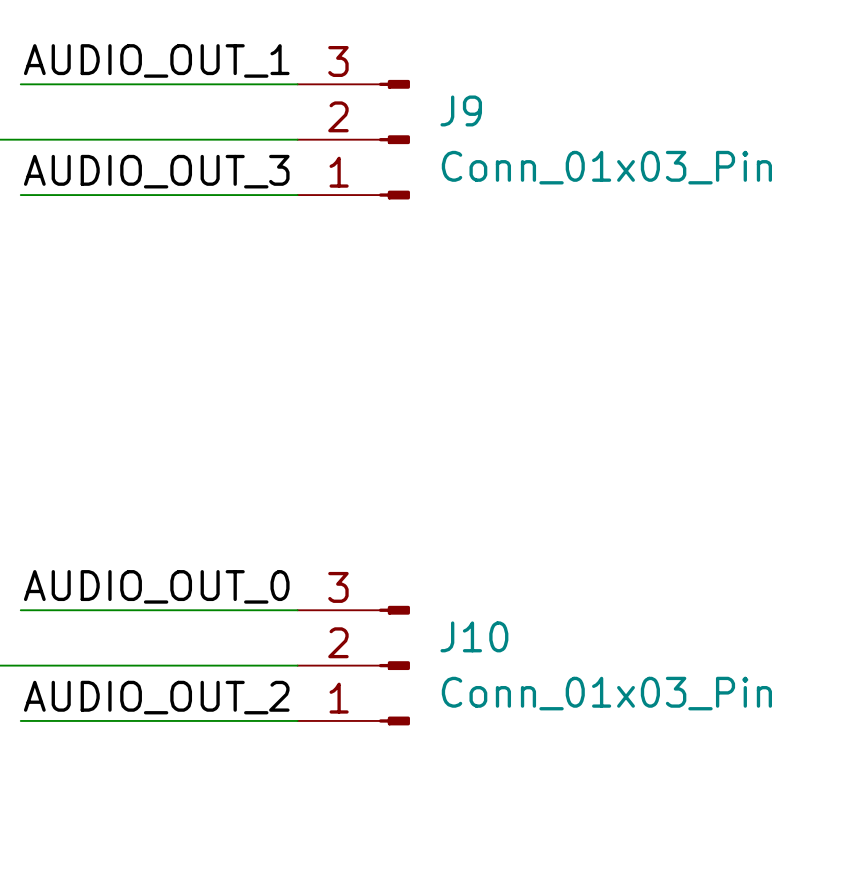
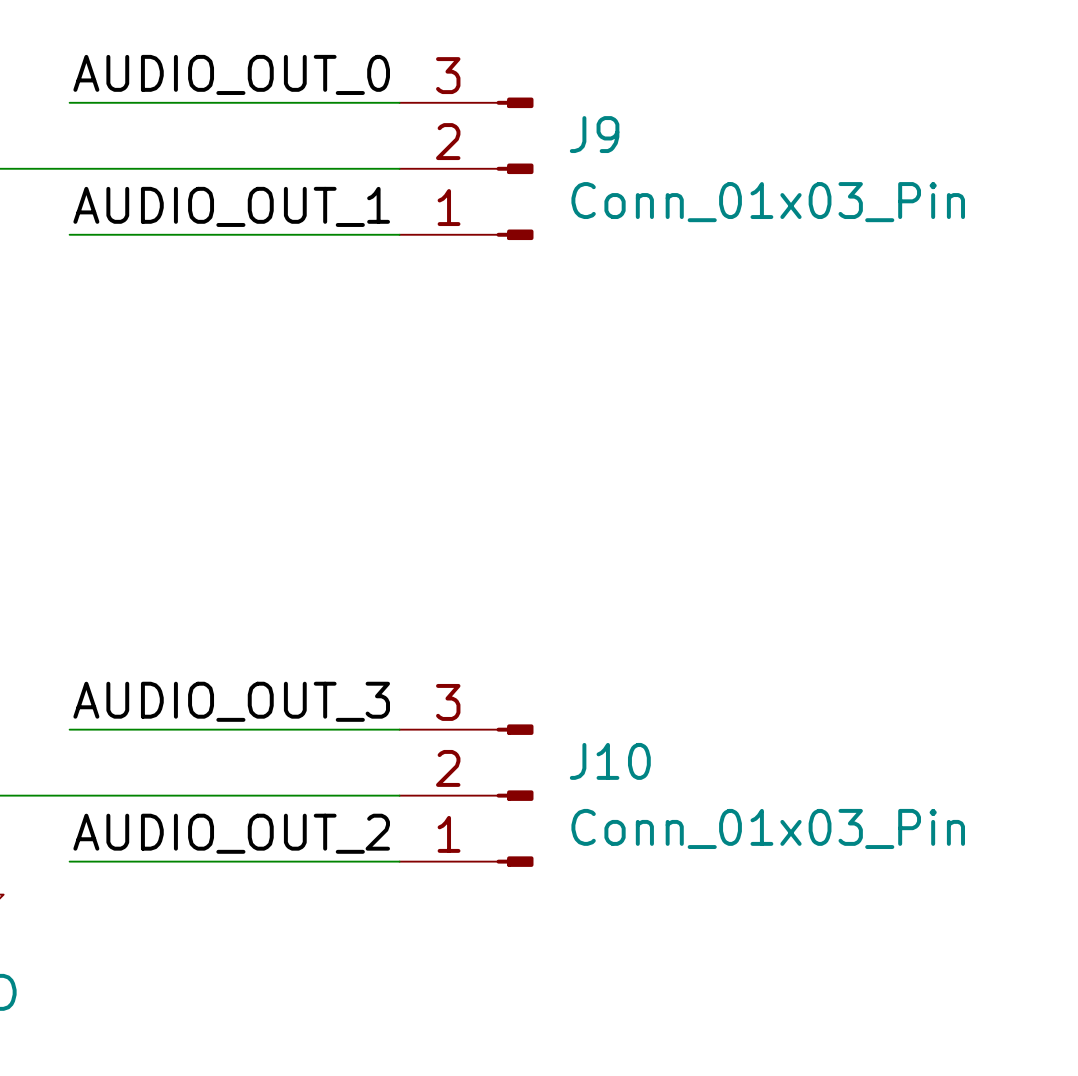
label: AUDIO_OUT_1 (156, 60) -> AUDIO_OUT_0 (231, 74)
label: AUDIO_OUT_3 (156, 171) -> AUDIO_OUT_1 (231, 206)
label: AUDIO_OUT_0 (156, 586) -> AUDIO_OUT_3 (231, 701)

